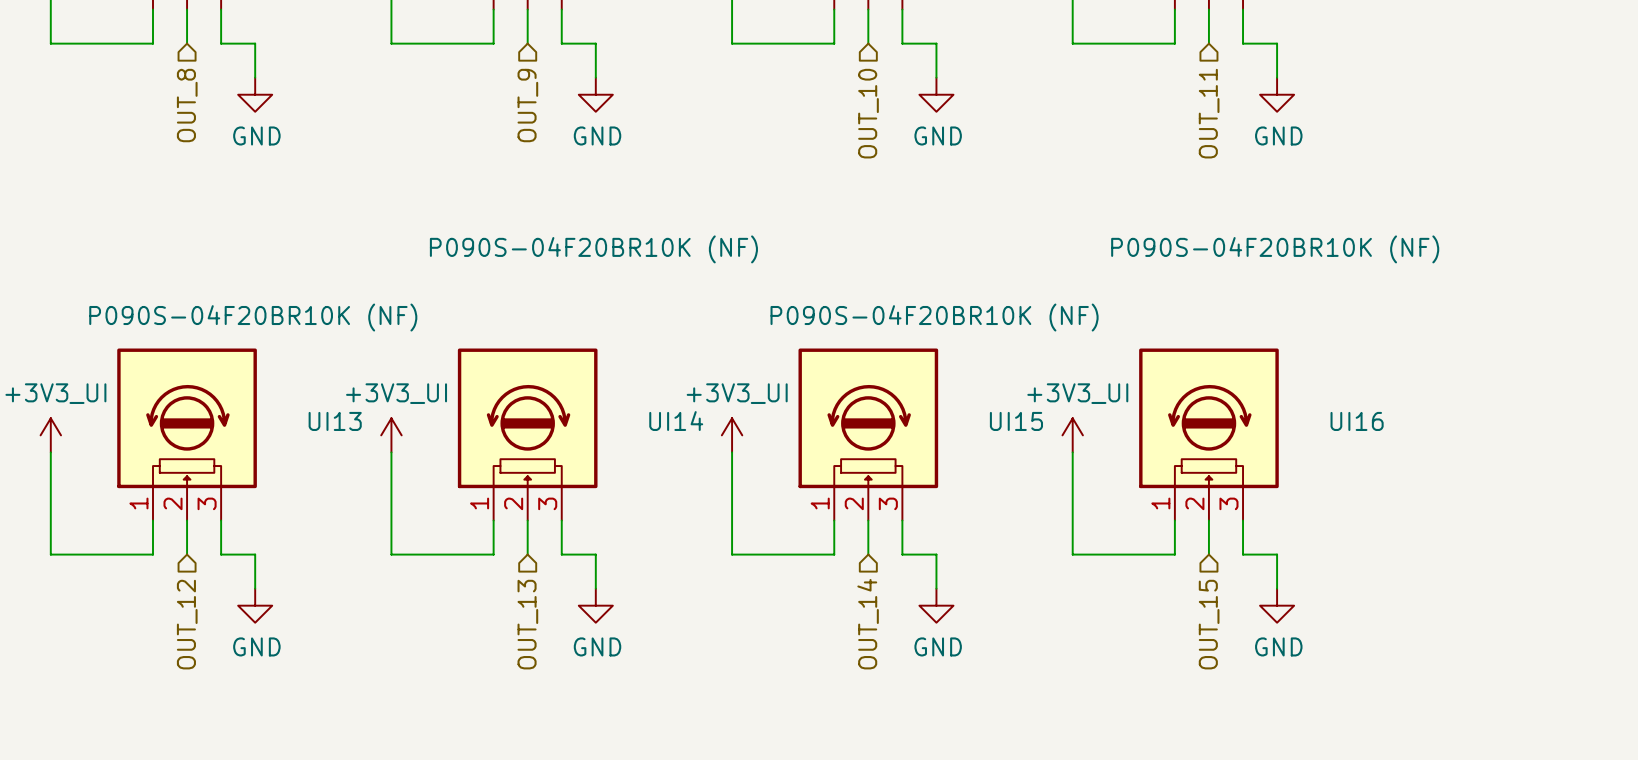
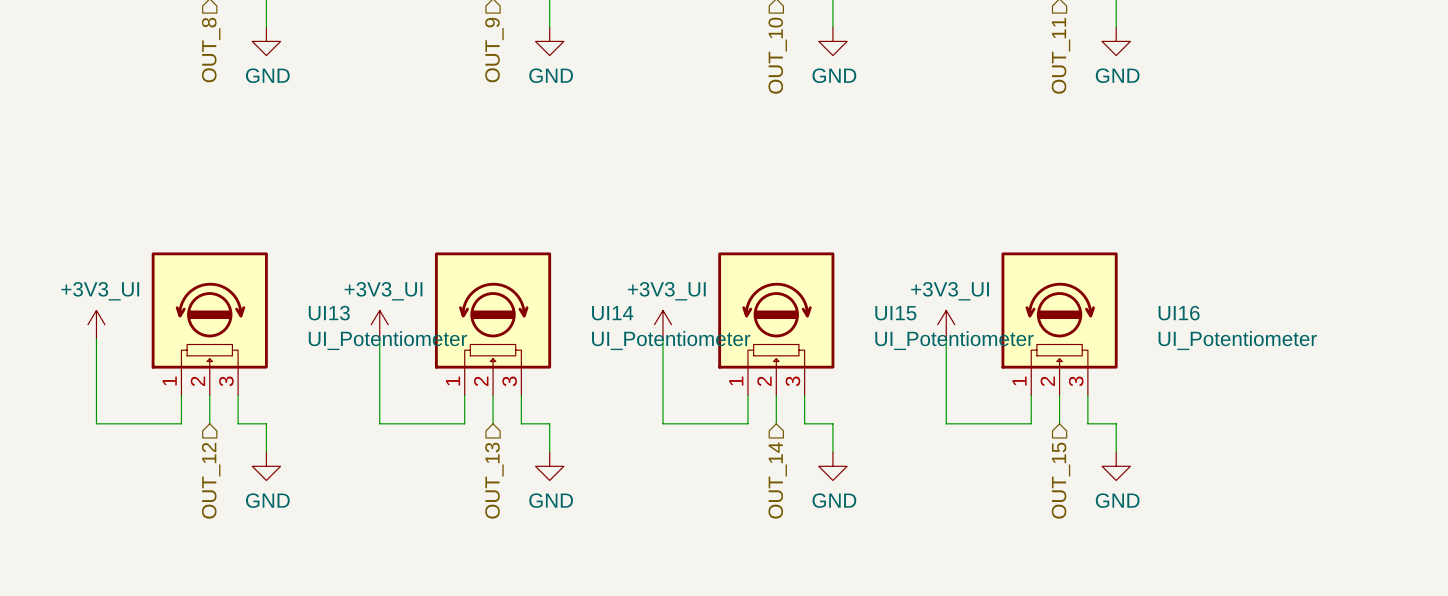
UI14 value: P090S-04F20BR10K (NF) (593, 249) -> UI_Potentiometer (671, 340)
UI16 value: P090S-04F20BR10K (NF) (1275, 249) -> UI_Potentiometer (1237, 340)
UI13 value: P090S-04F20BR10K (NF) (253, 317) -> UI_Potentiometer (387, 340)
UI15 value: P090S-04F20BR10K (NF) (934, 317) -> UI_Potentiometer (954, 340)

